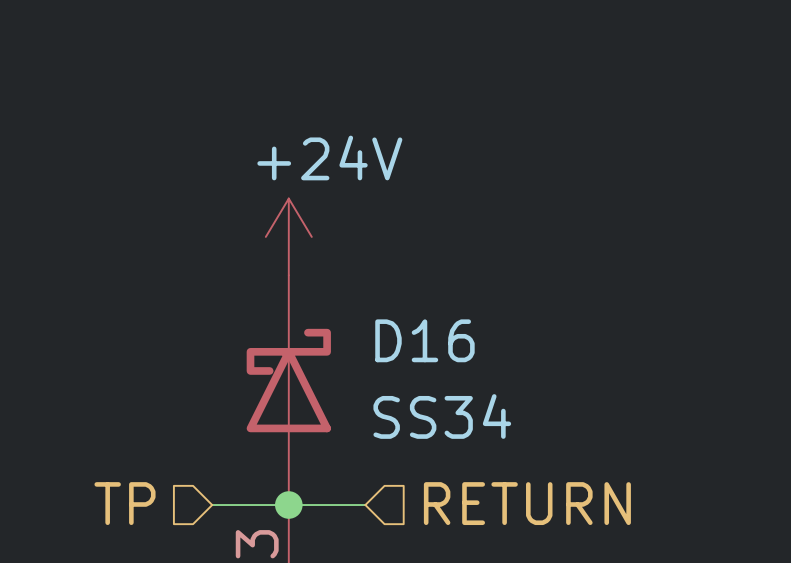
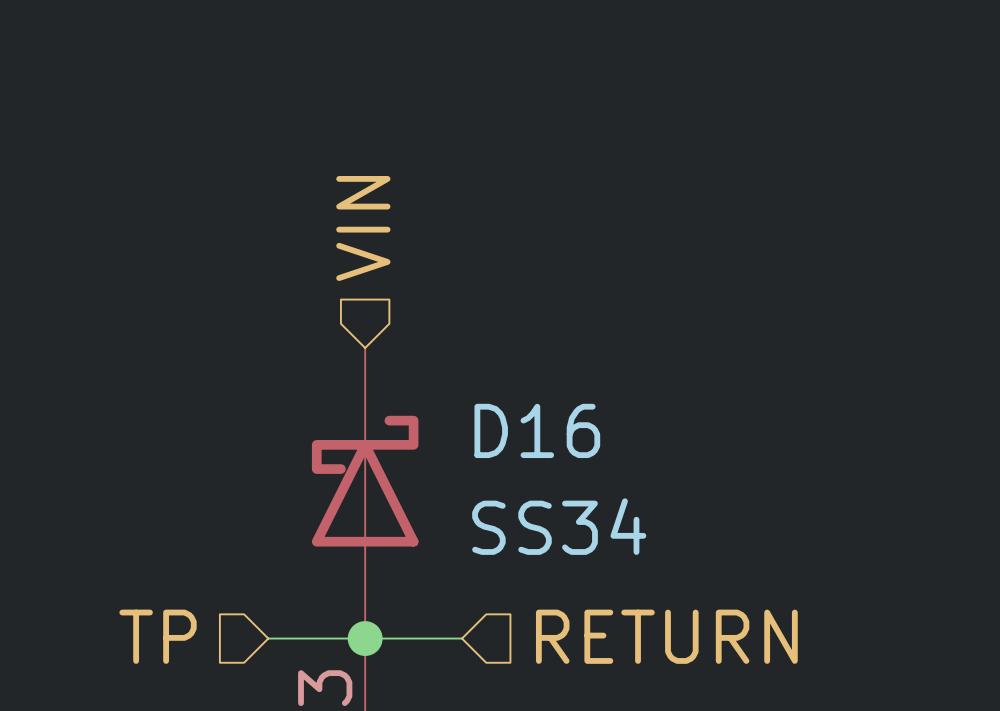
hierarchical label: none -> VIN (363, 228)
power symbol: +24V (288, 236) -> none

